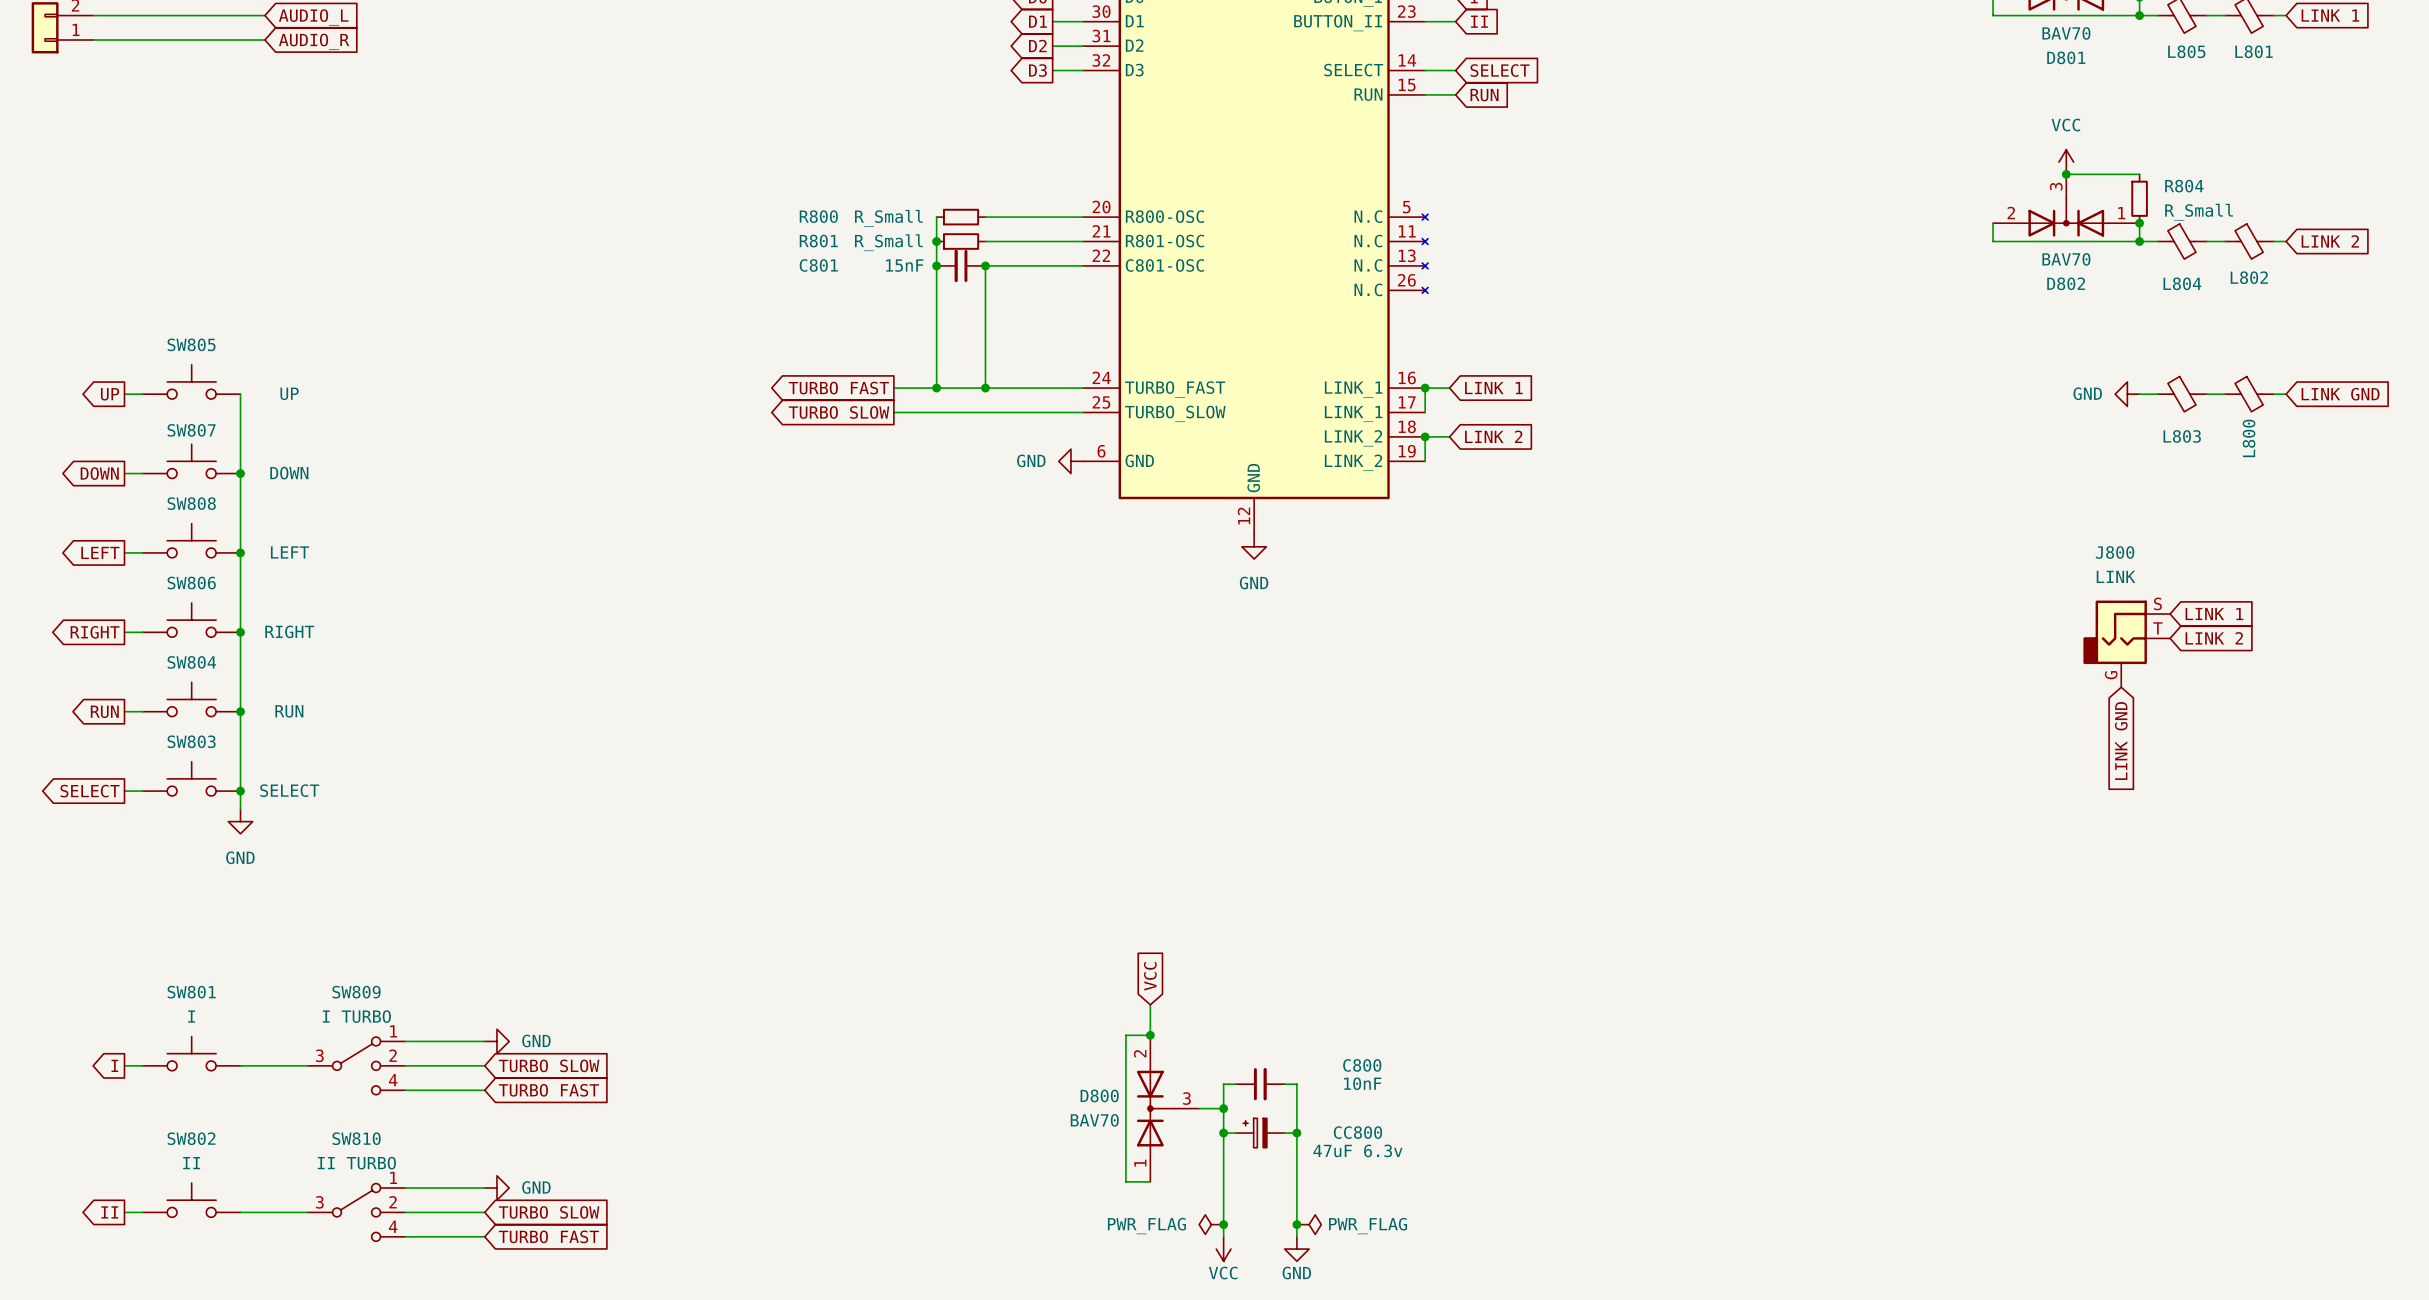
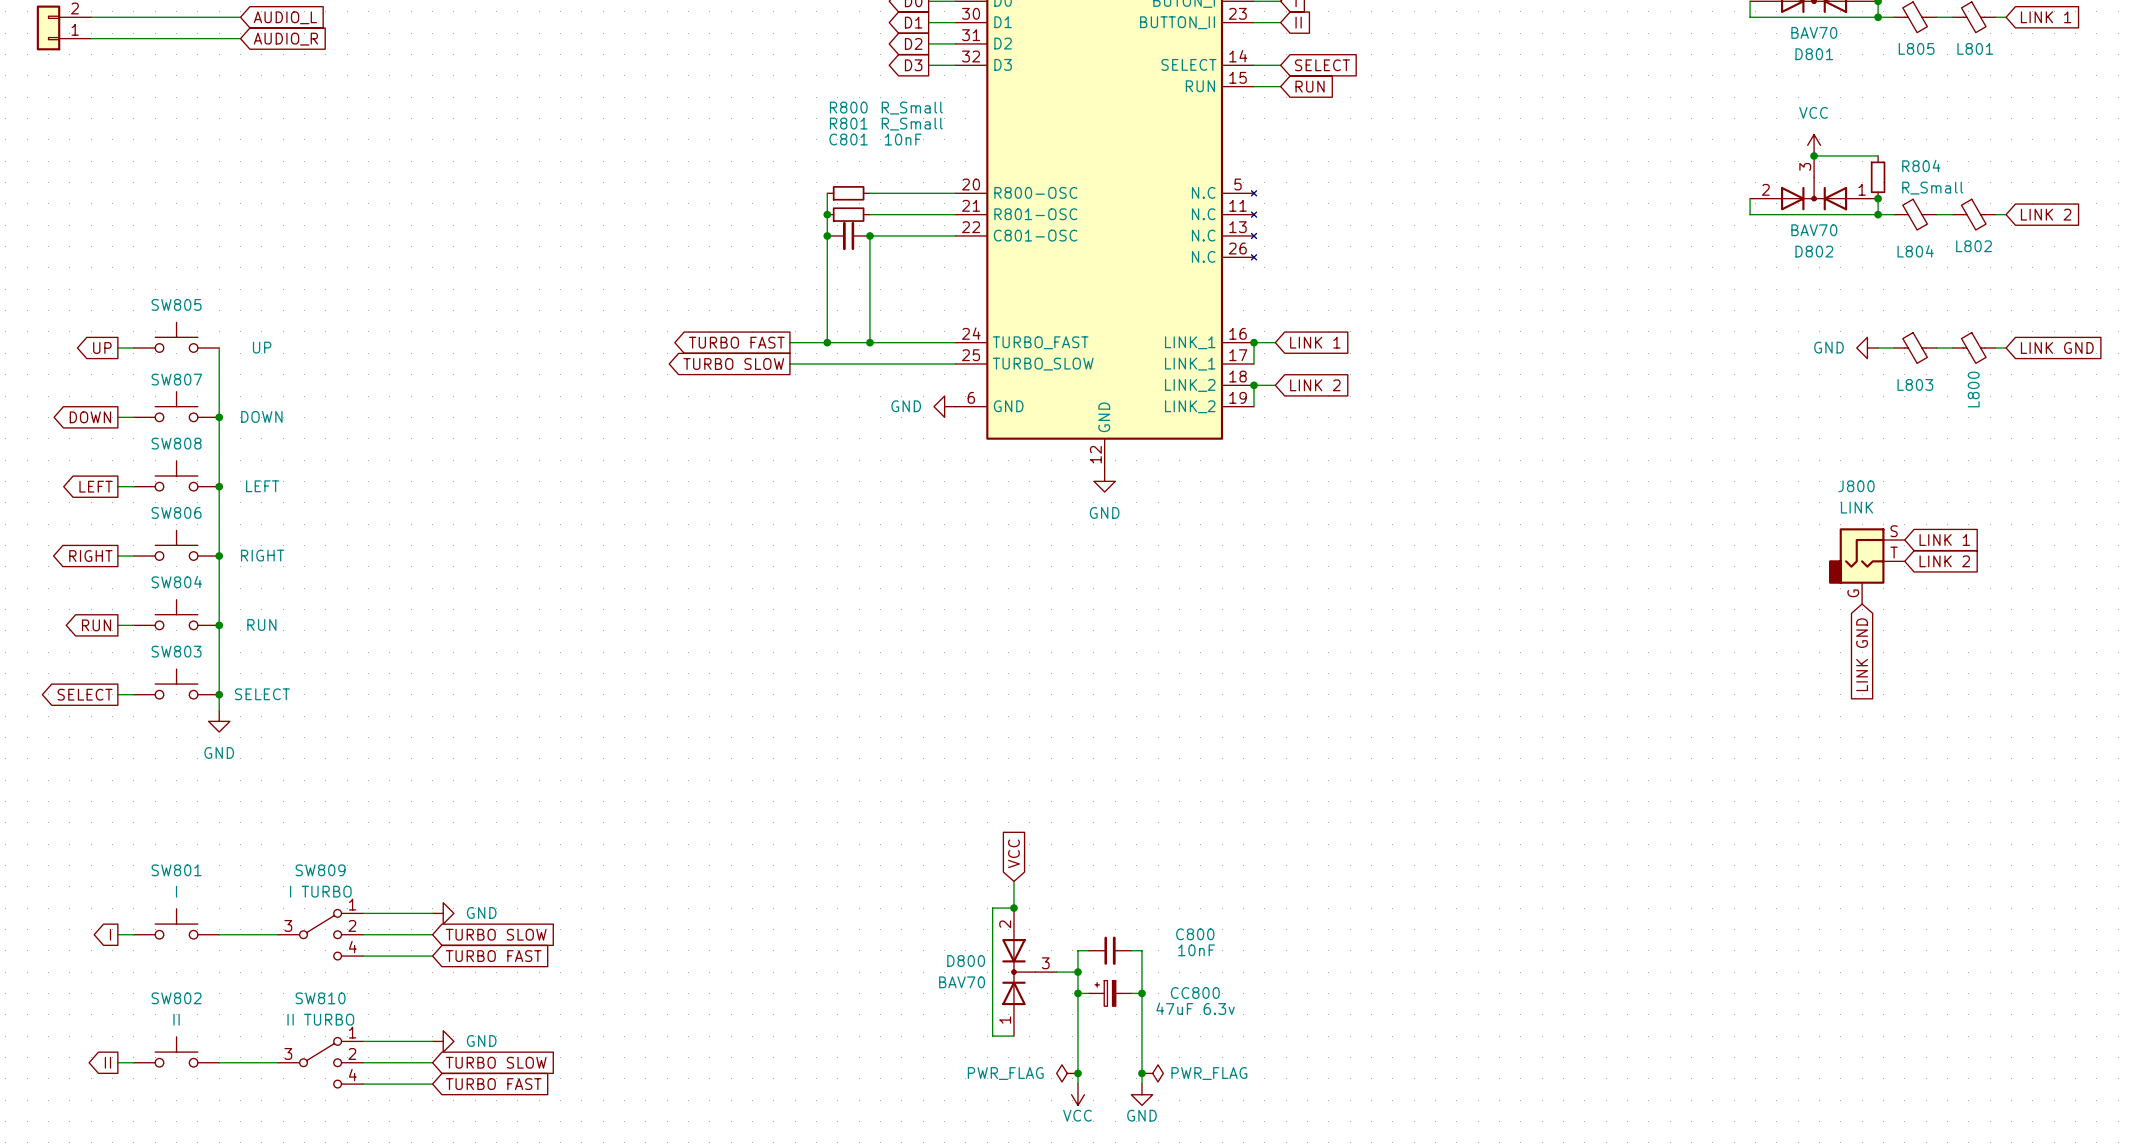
R800 name position: R800 (818, 216) -> R800 (848, 107)
R800 value position: R_Small (888, 218) -> R_Small (912, 108)
R801 name position: R801 (818, 241) -> R801 (848, 123)
R801 value position: R_Small (888, 242) -> R_Small (912, 124)
C801 name position: C801 (818, 265) -> C801 (848, 139)
C801 value: 15nF (904, 265) -> 10nF (903, 139)

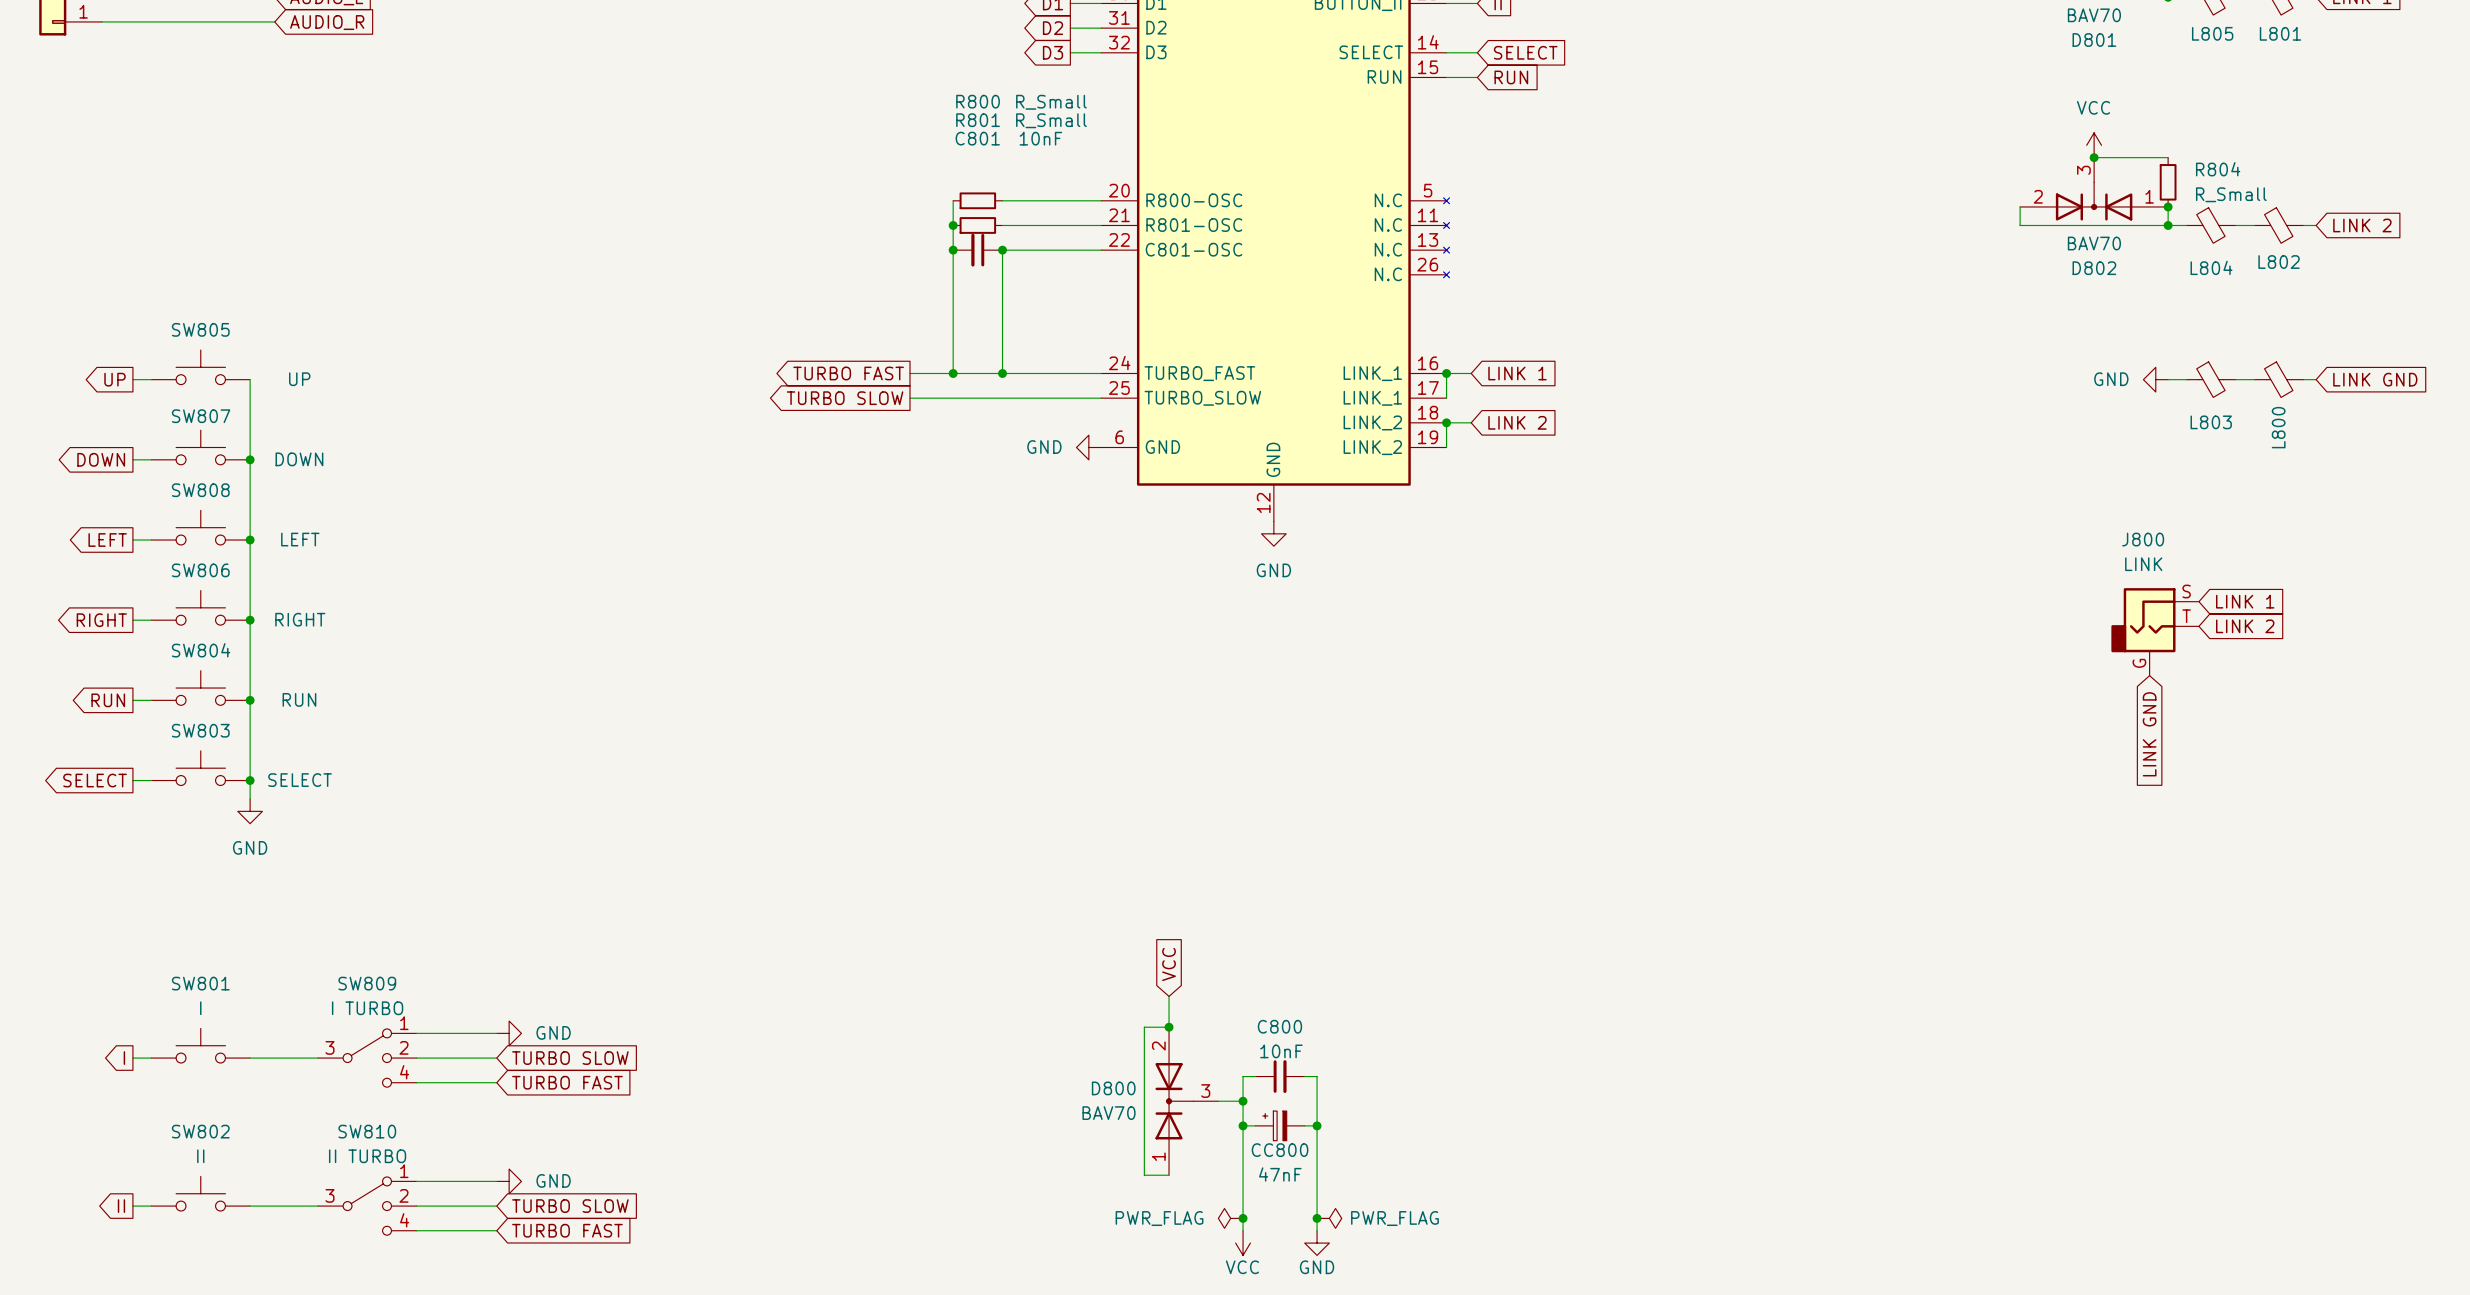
C800 name position: C800 (1195, 934) -> C800 (1279, 1026)
C800 value position: 10nF (1196, 950) -> 10nF (1281, 1051)
CC800 name position: CC800 (1195, 993) -> CC800 (1280, 1150)
CC800 value: 47uF 6.3v (1195, 1008) -> 47nF (1280, 1174)

